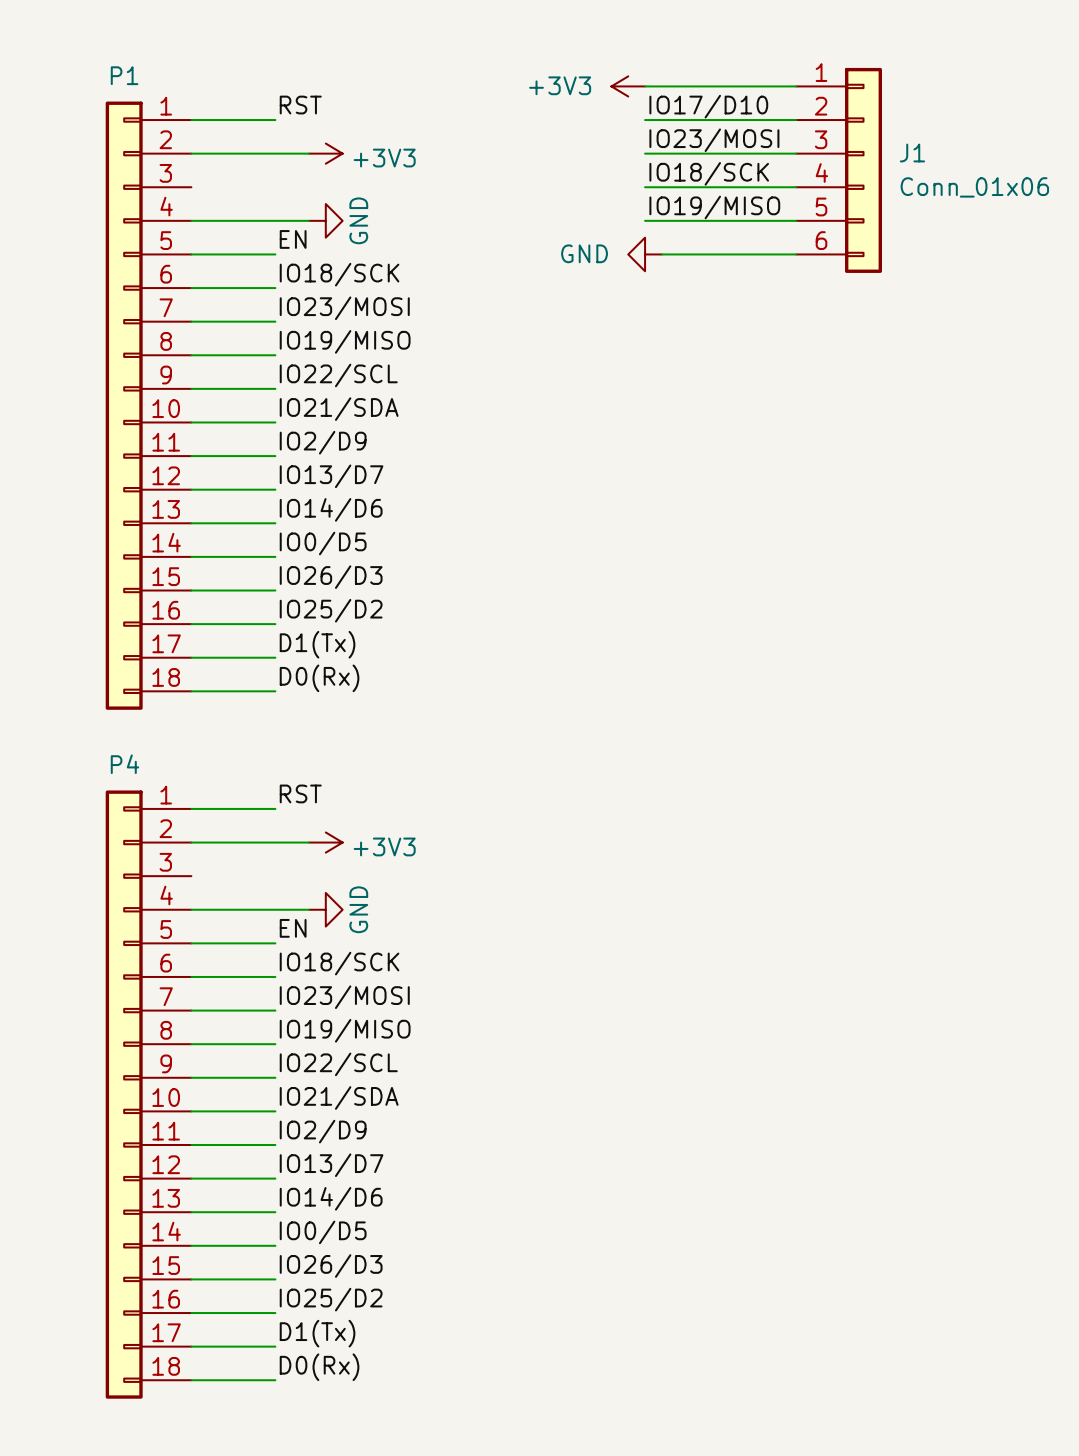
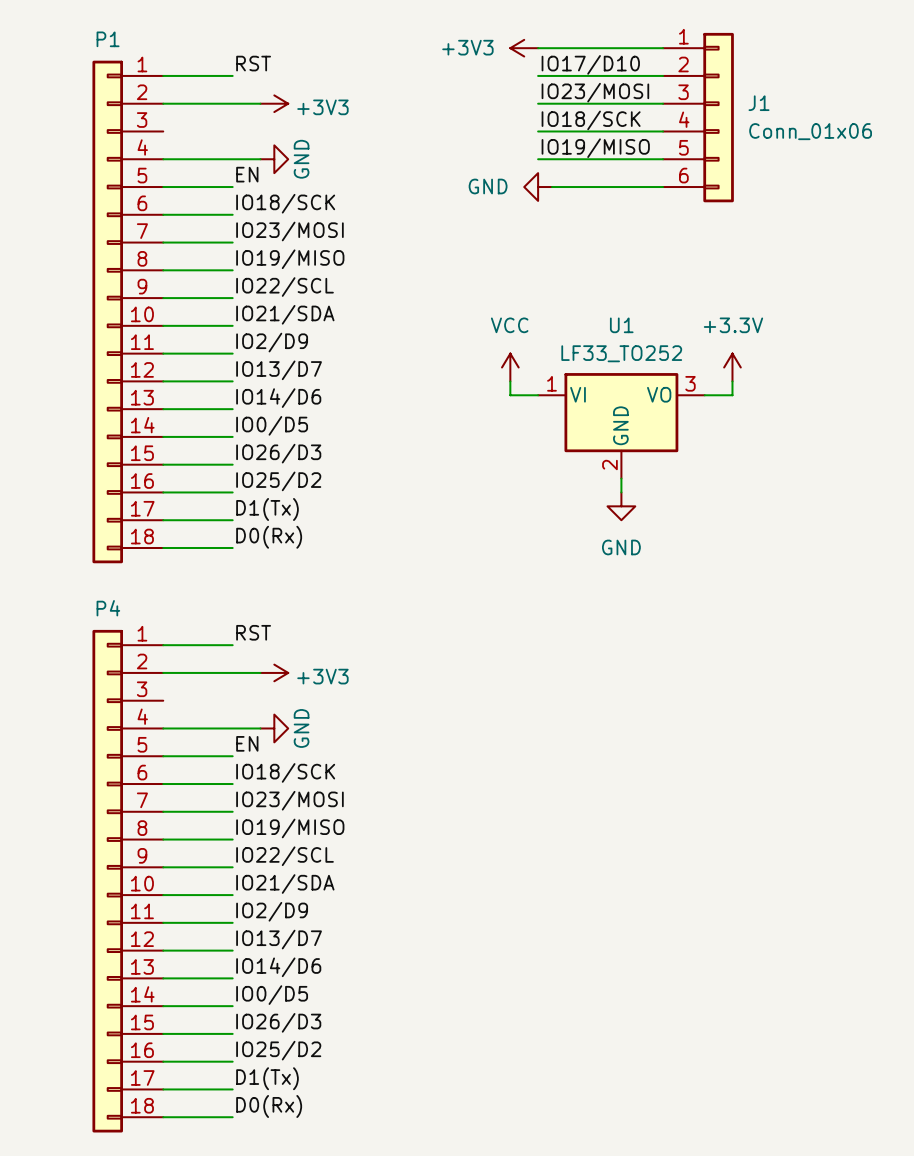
power symbol: none -> VCC (510, 367)
power symbol: none -> +3.3V (732, 367)
wire: none -> (510, 381) (510, 395) (538, 395)
wire: none -> (732, 381) (732, 395) (704, 395)
U1: none -> LF33_TO252 (621, 425)
wire: none -> (621, 478) (621, 492)
power symbol: none -> GND (621, 506)

